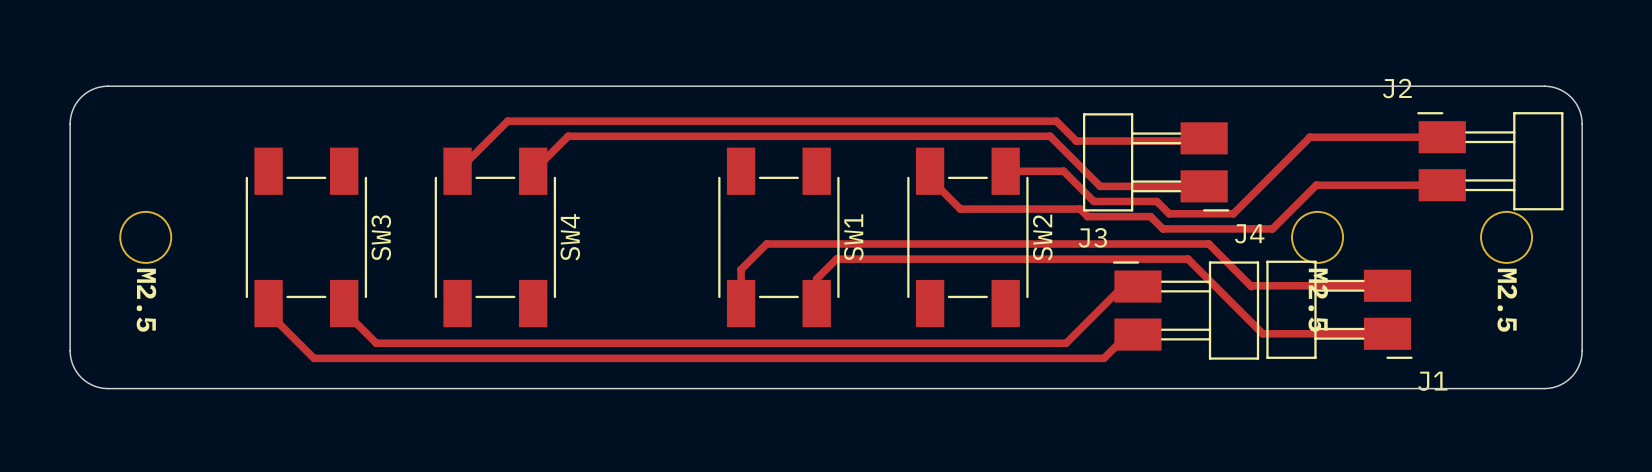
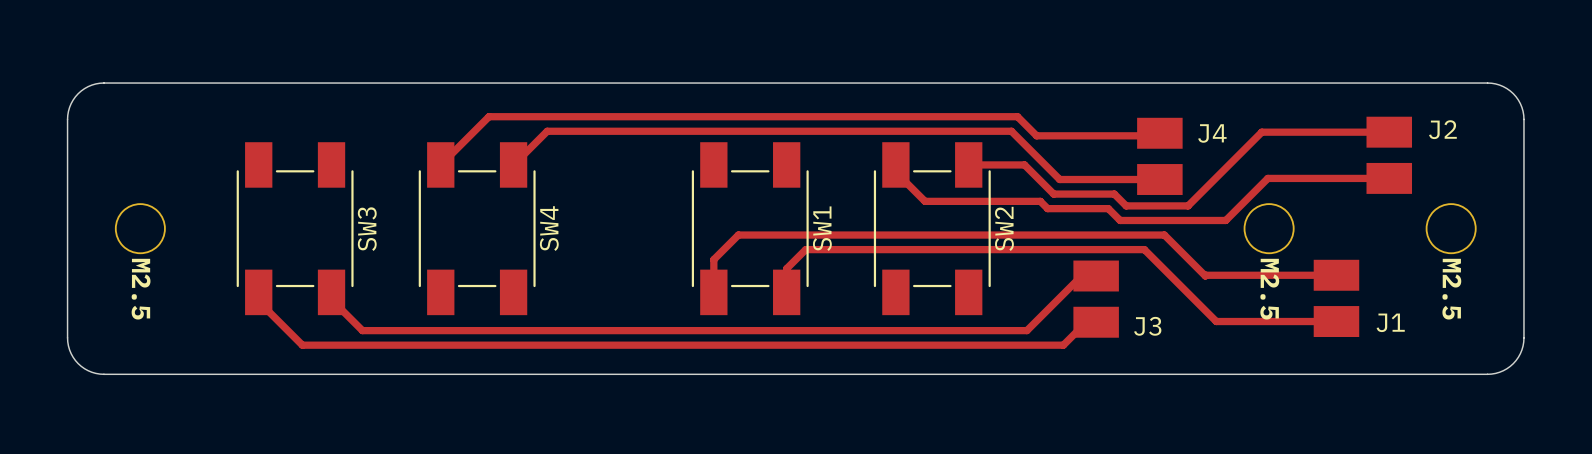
J2 name position: J2 (1397, 88) -> J2 (1442, 129)
J2 footprint: [1417, 112, 1564, 211] -> [1366, 116, 1413, 194]
J4 footprint: [1083, 113, 1230, 212] -> [1137, 117, 1183, 195]
J4 name position: J4 (1249, 233) -> J4 (1212, 133)
J3 name position: J3 (1092, 237) -> J3 (1147, 326)
J1 footprint: [1266, 260, 1413, 359] -> [1313, 259, 1360, 337]
J3 footprint: [1112, 261, 1260, 360] -> [1073, 260, 1119, 338]
J1 name position: J1 (1432, 381) -> J1 (1390, 322)

